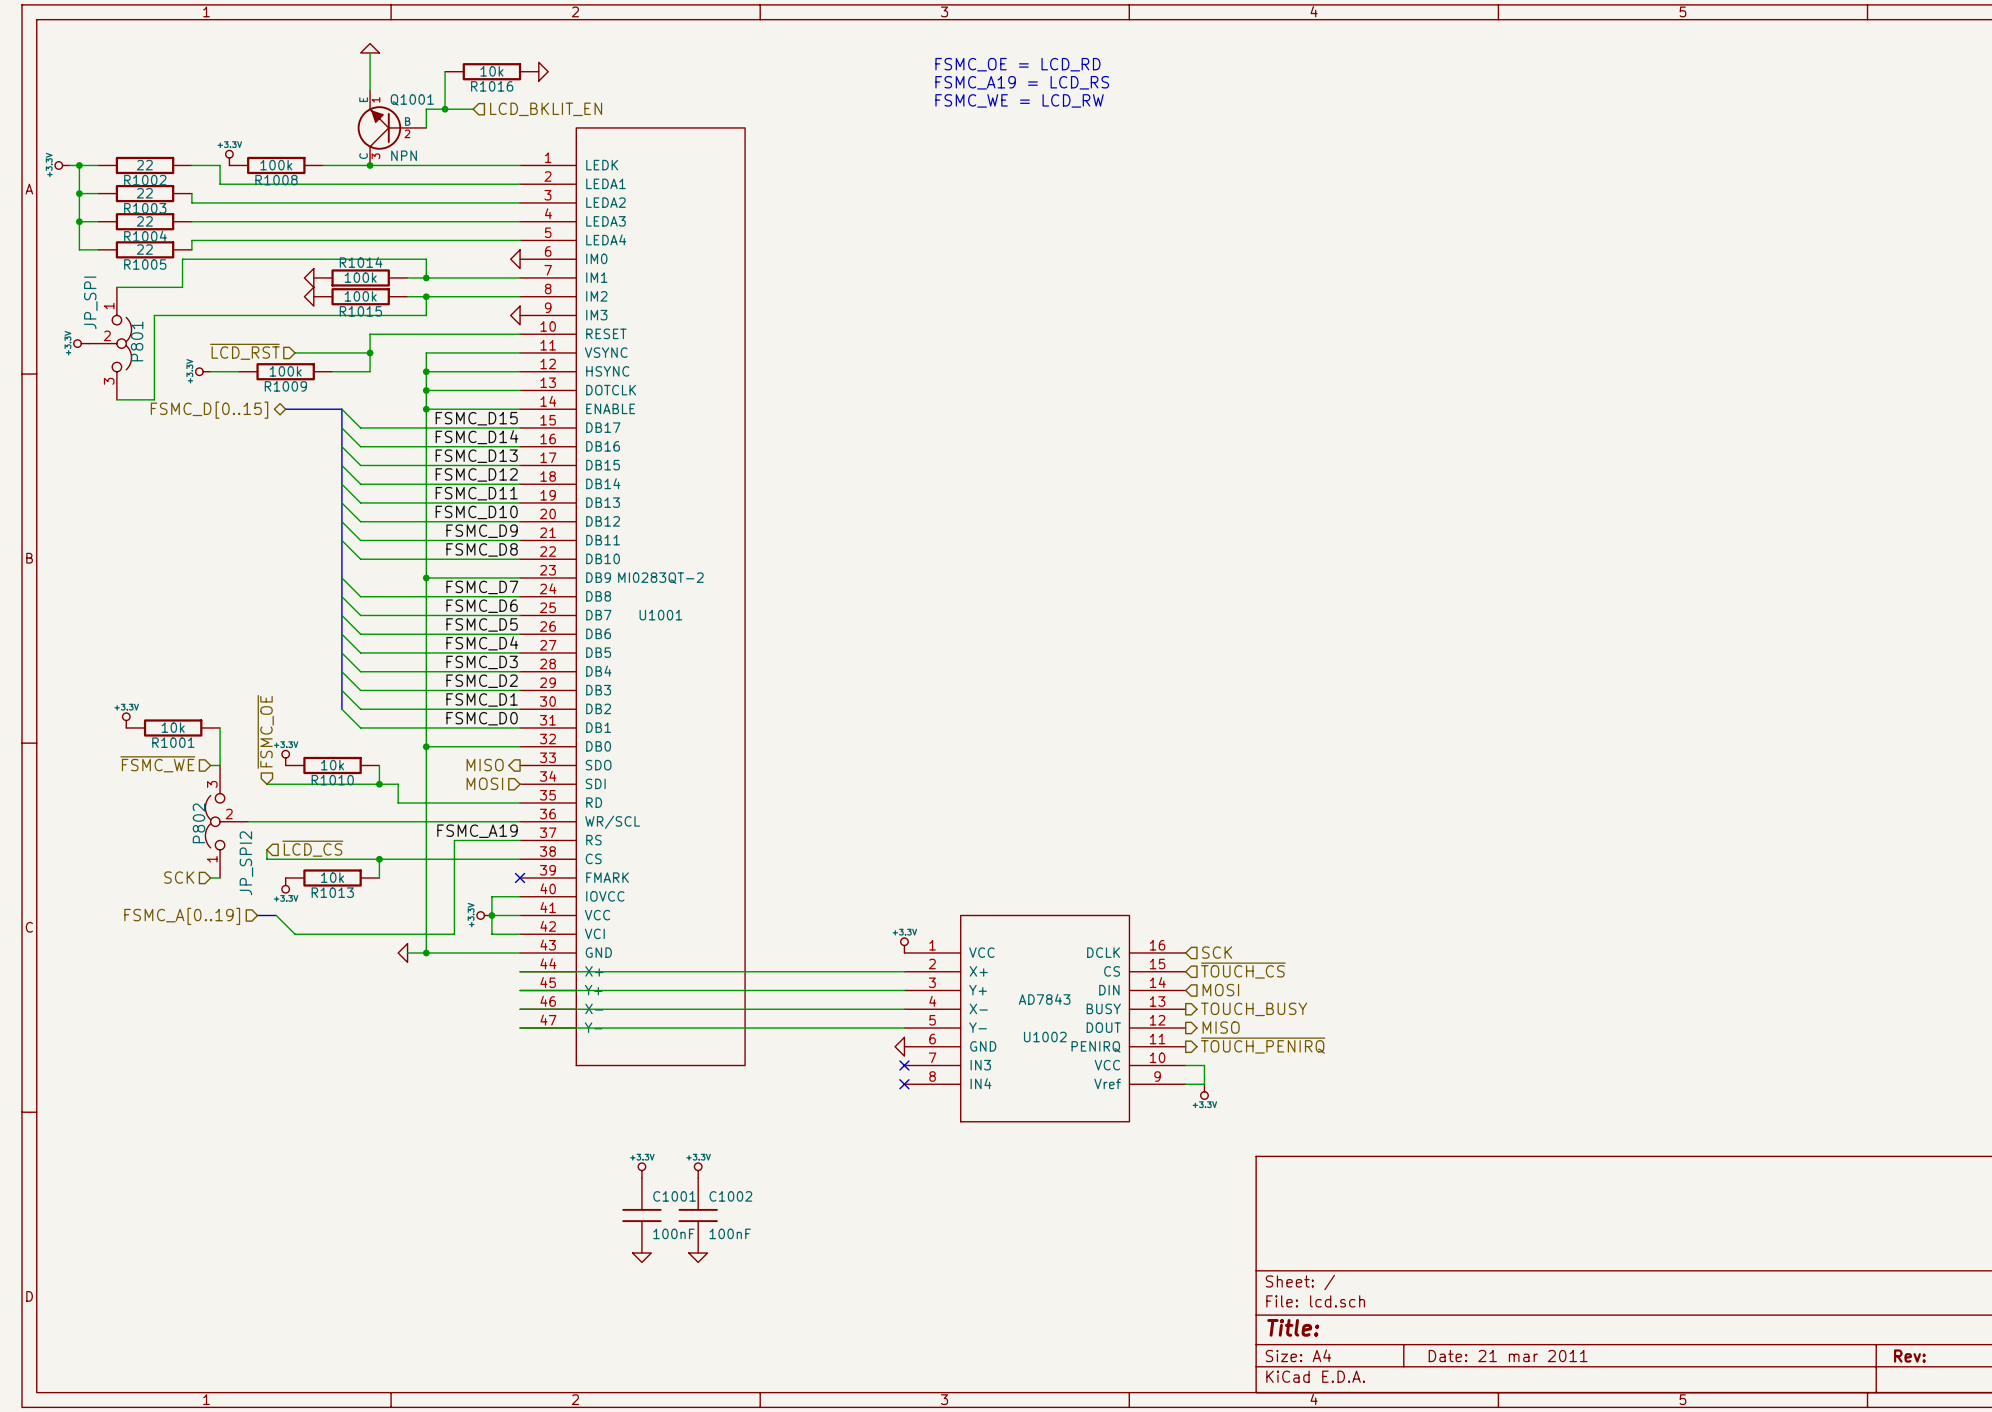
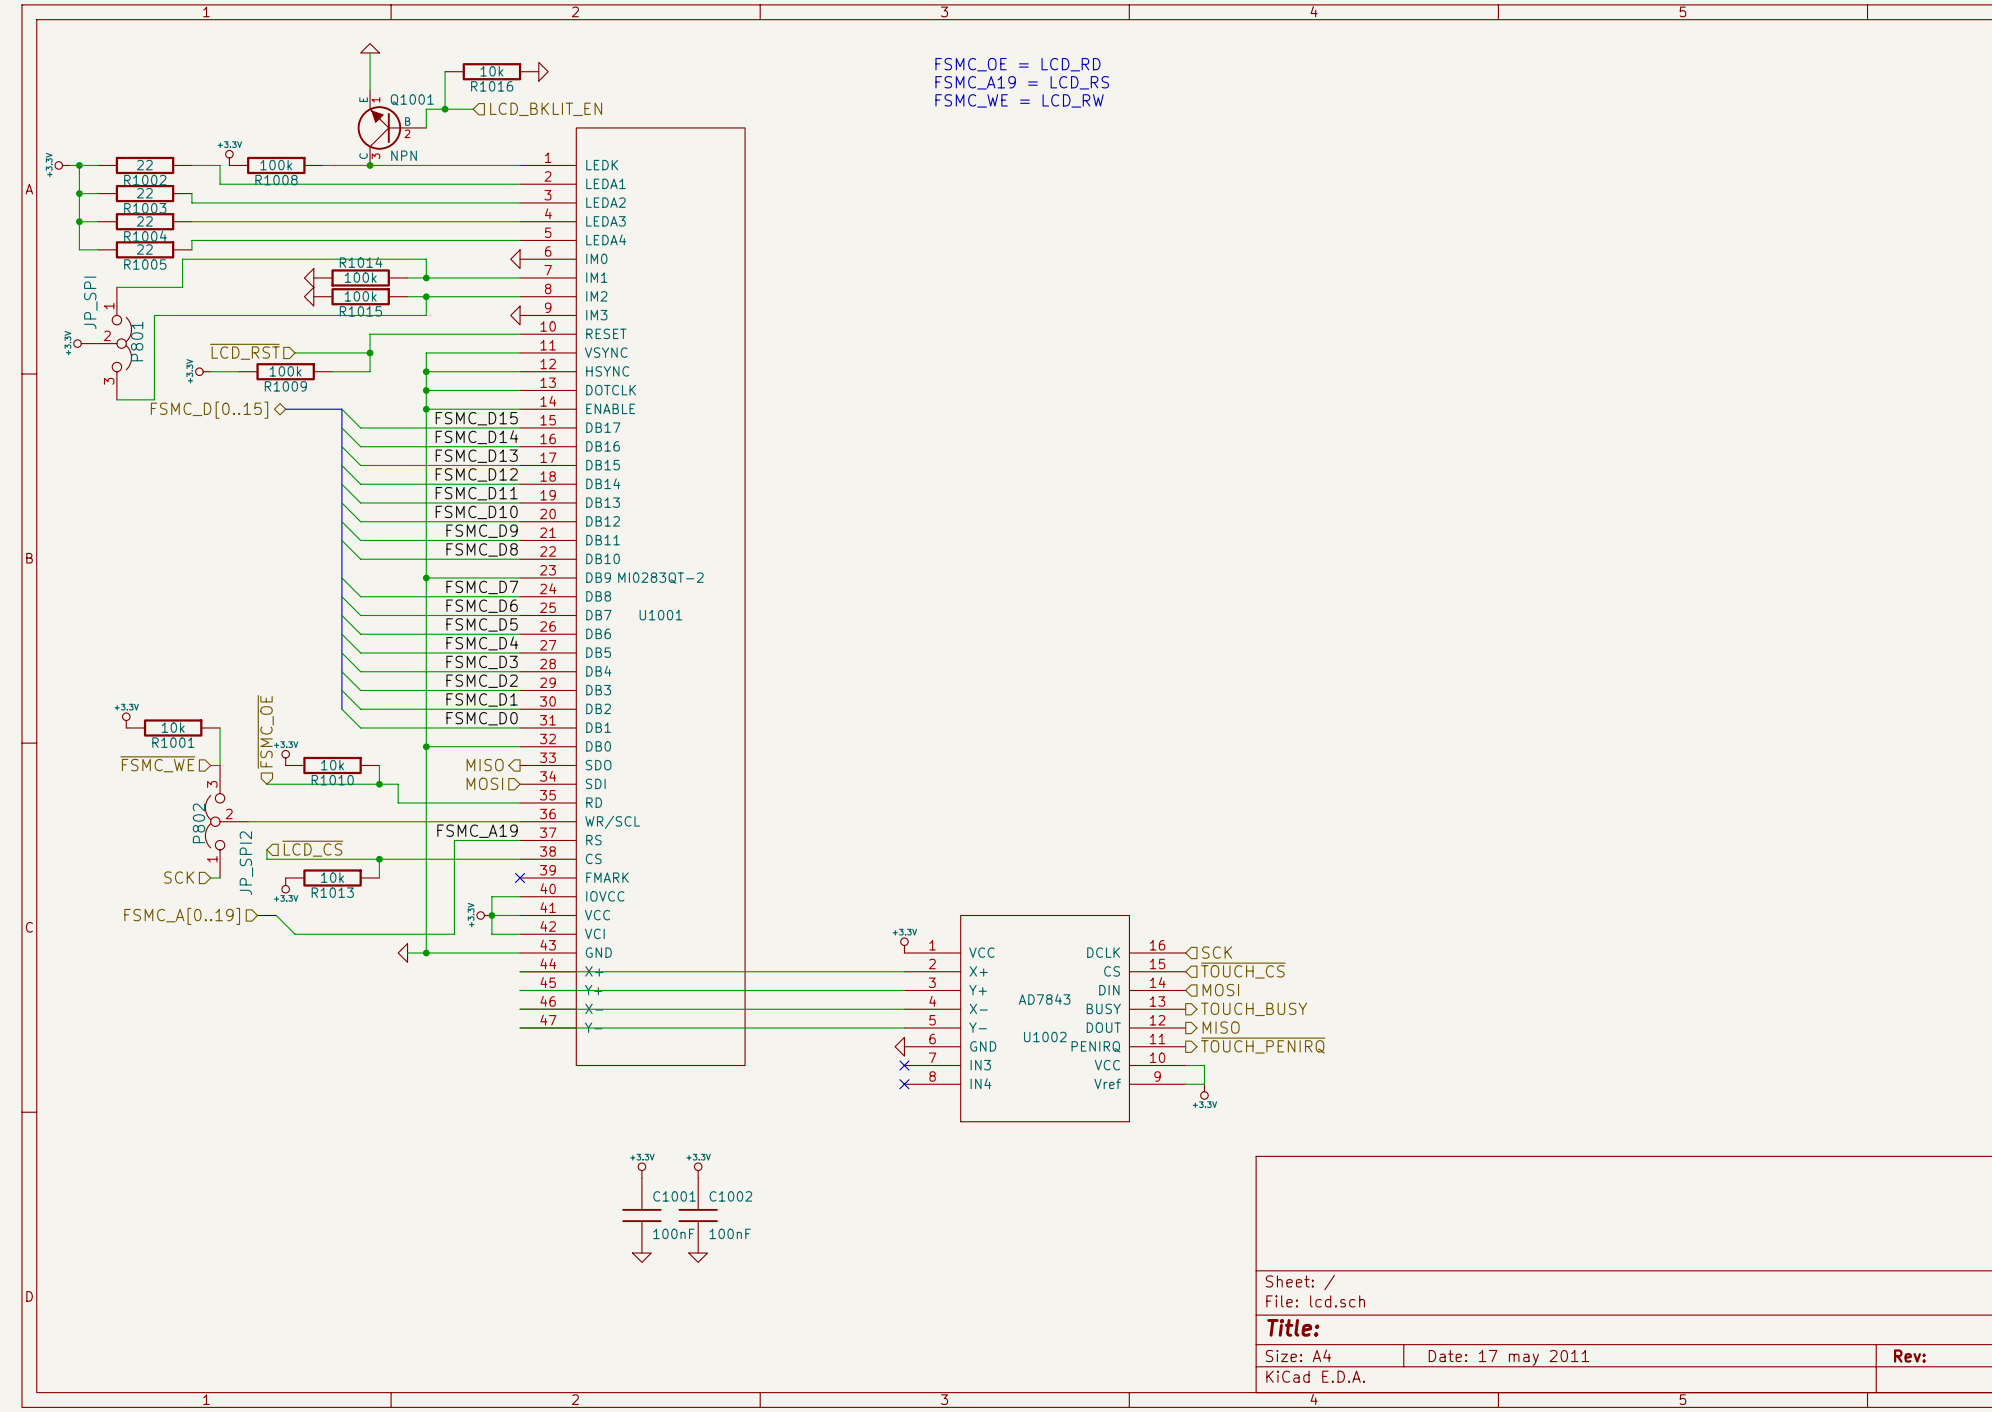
title block: Date: 21 mar 2011 (1508, 1356) -> Date: 17 may 2011 (1508, 1357)

